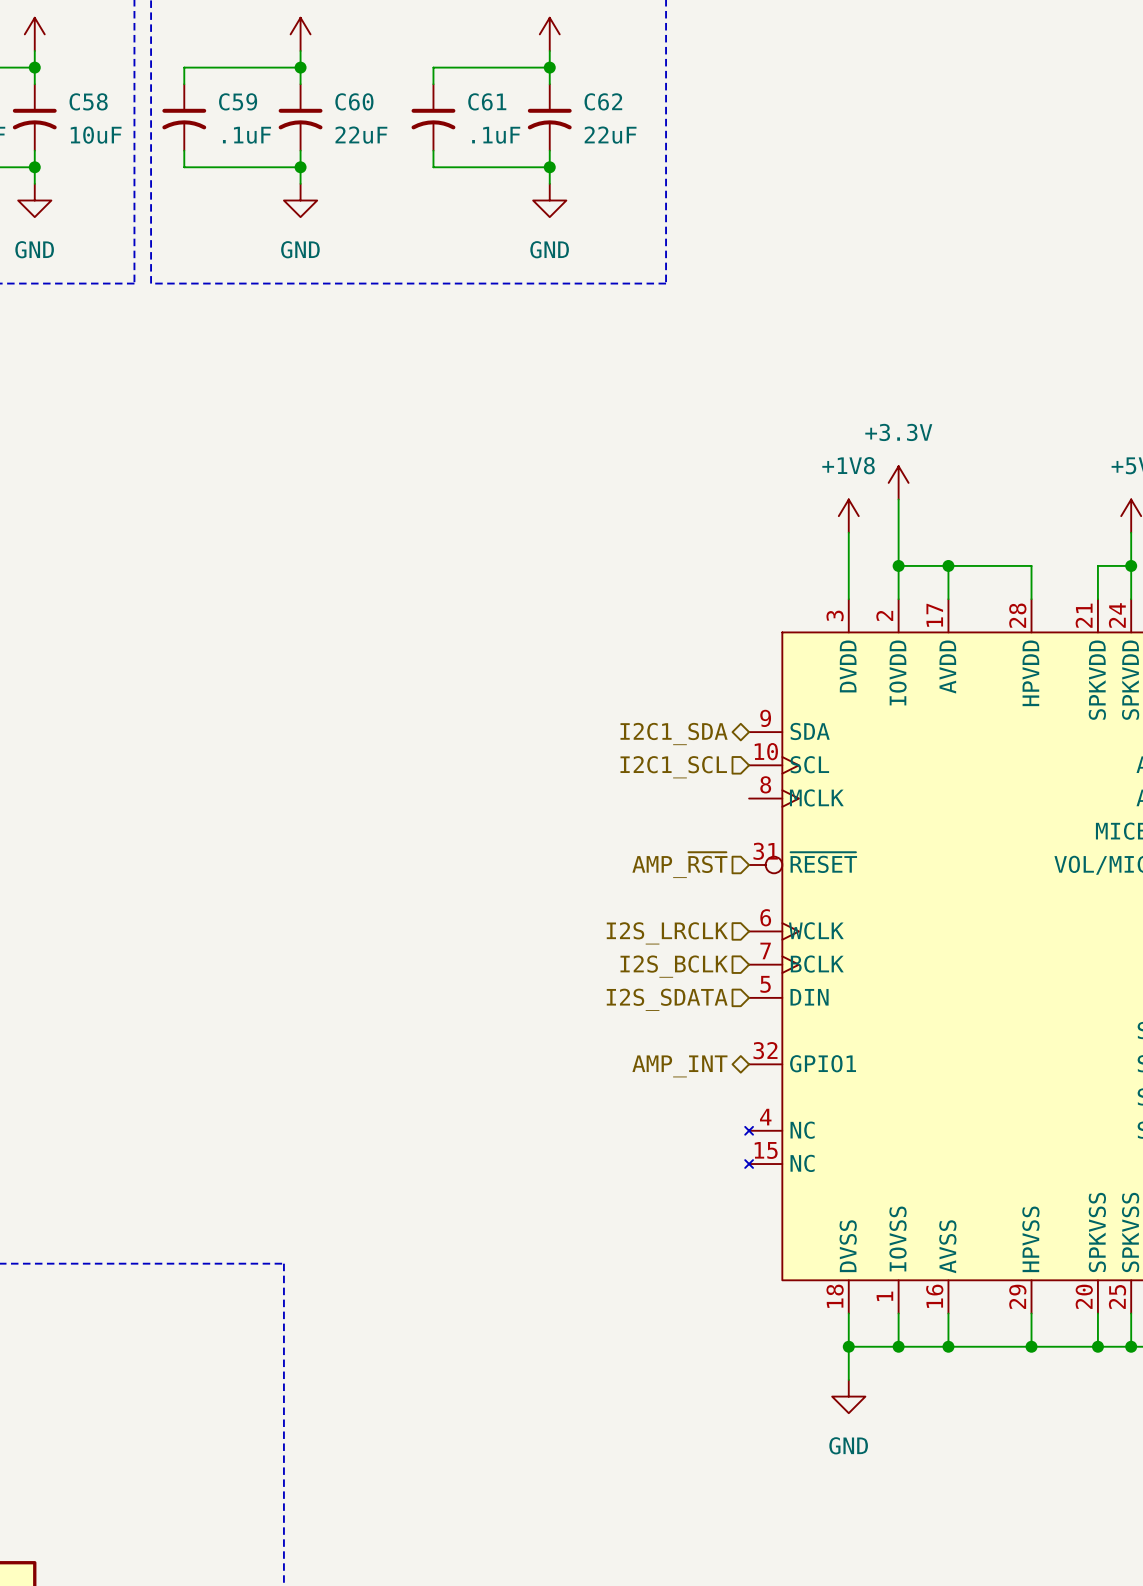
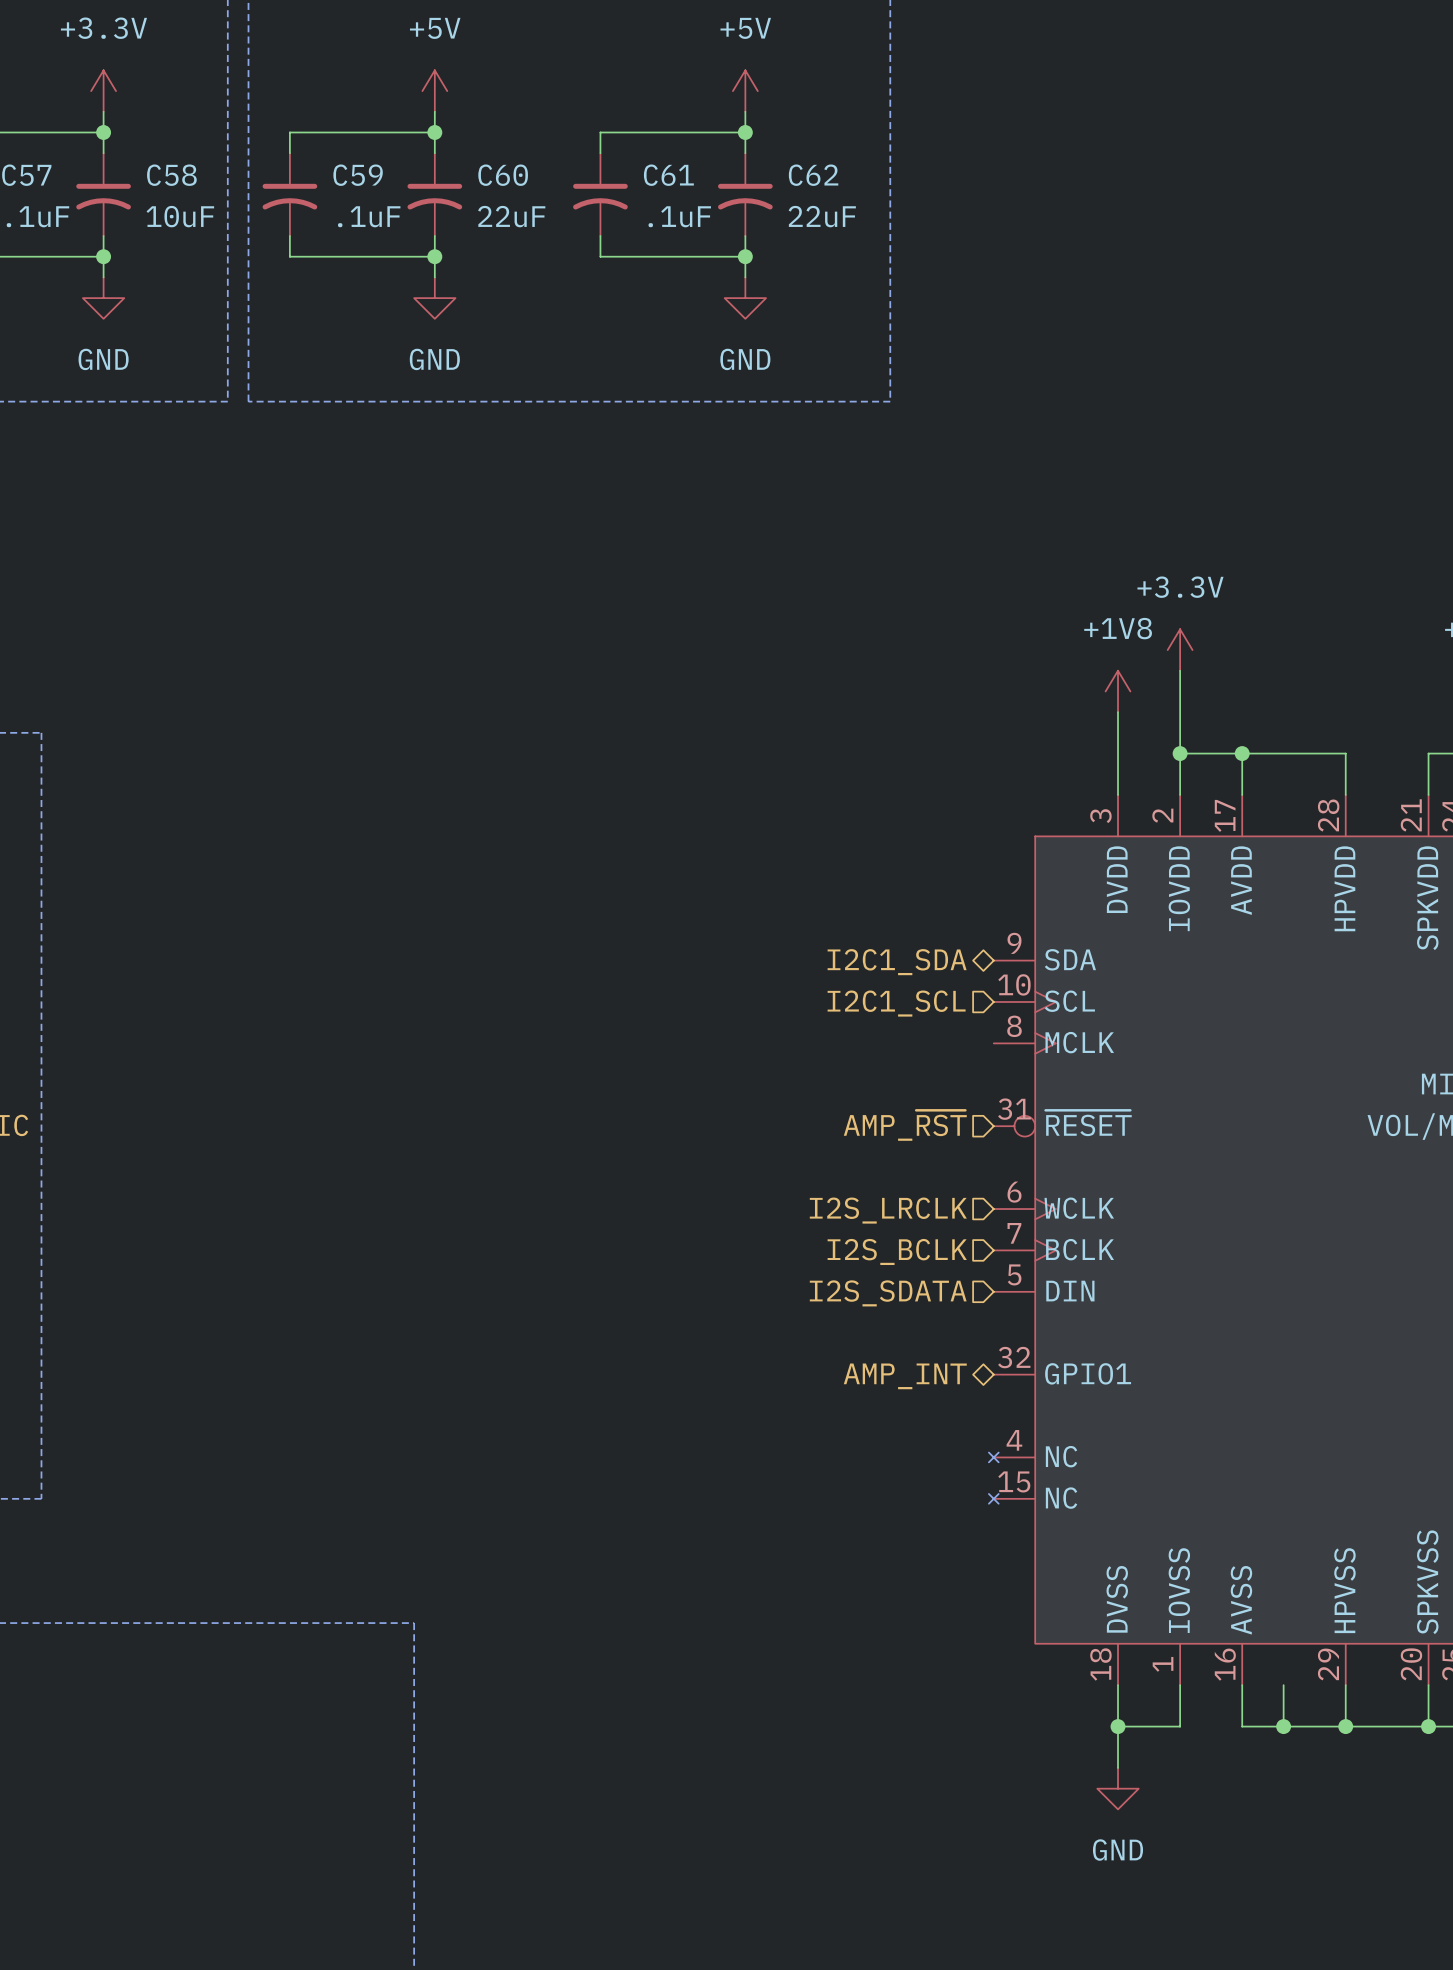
wire: none -> (1283, 1685) (1283, 1726)
wire: (898, 1346) (948, 1346) -> none
junction: (898, 1346) -> none
junction position: (948, 1346) -> (1283, 1726)

